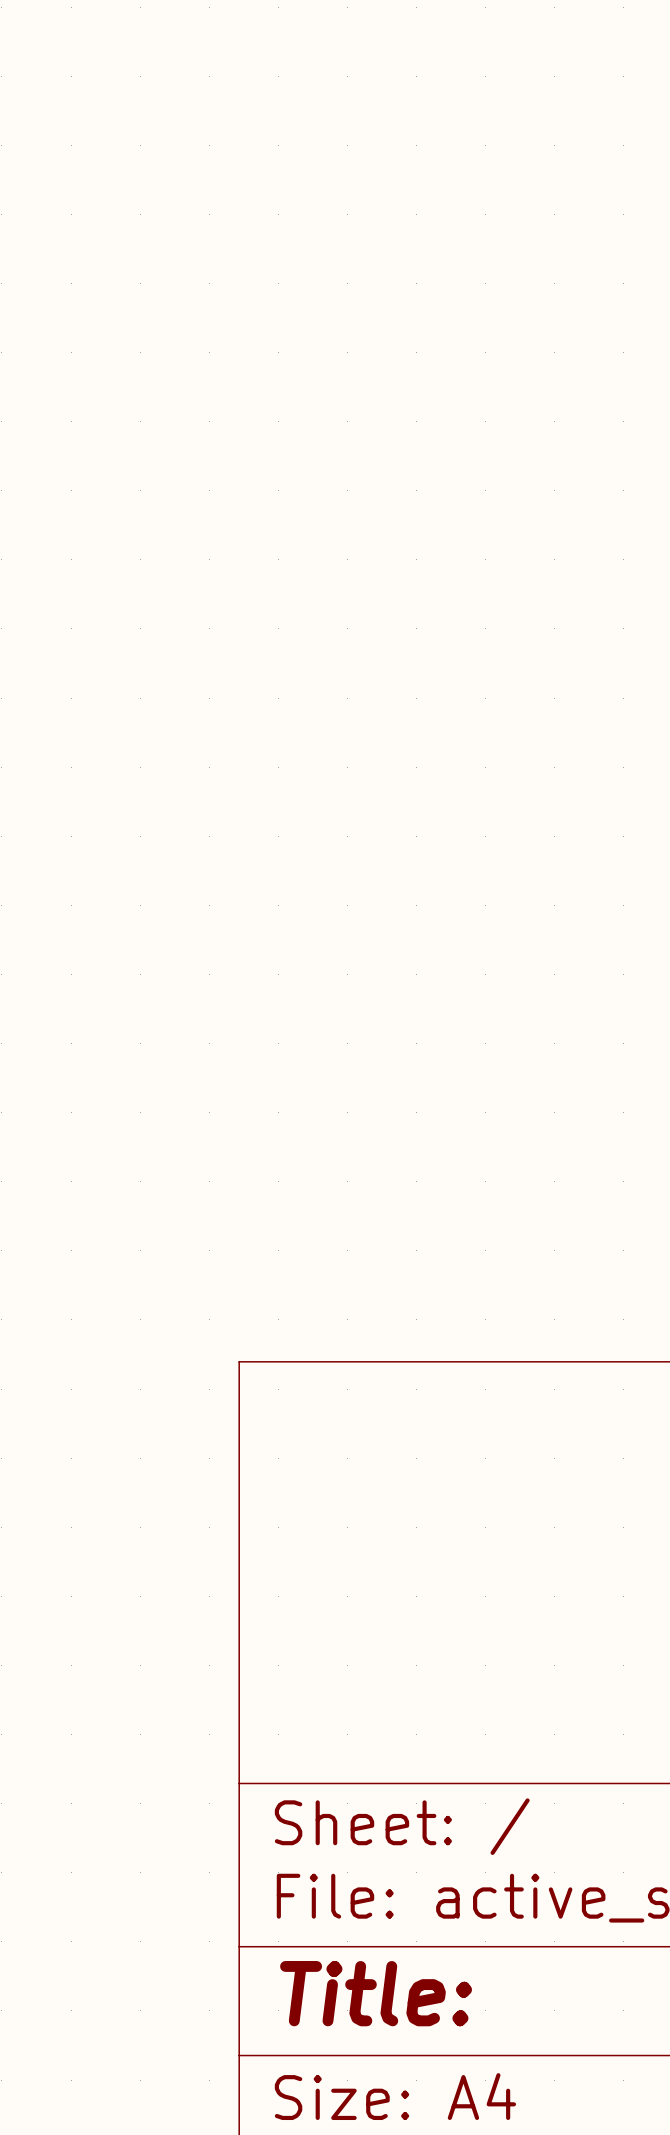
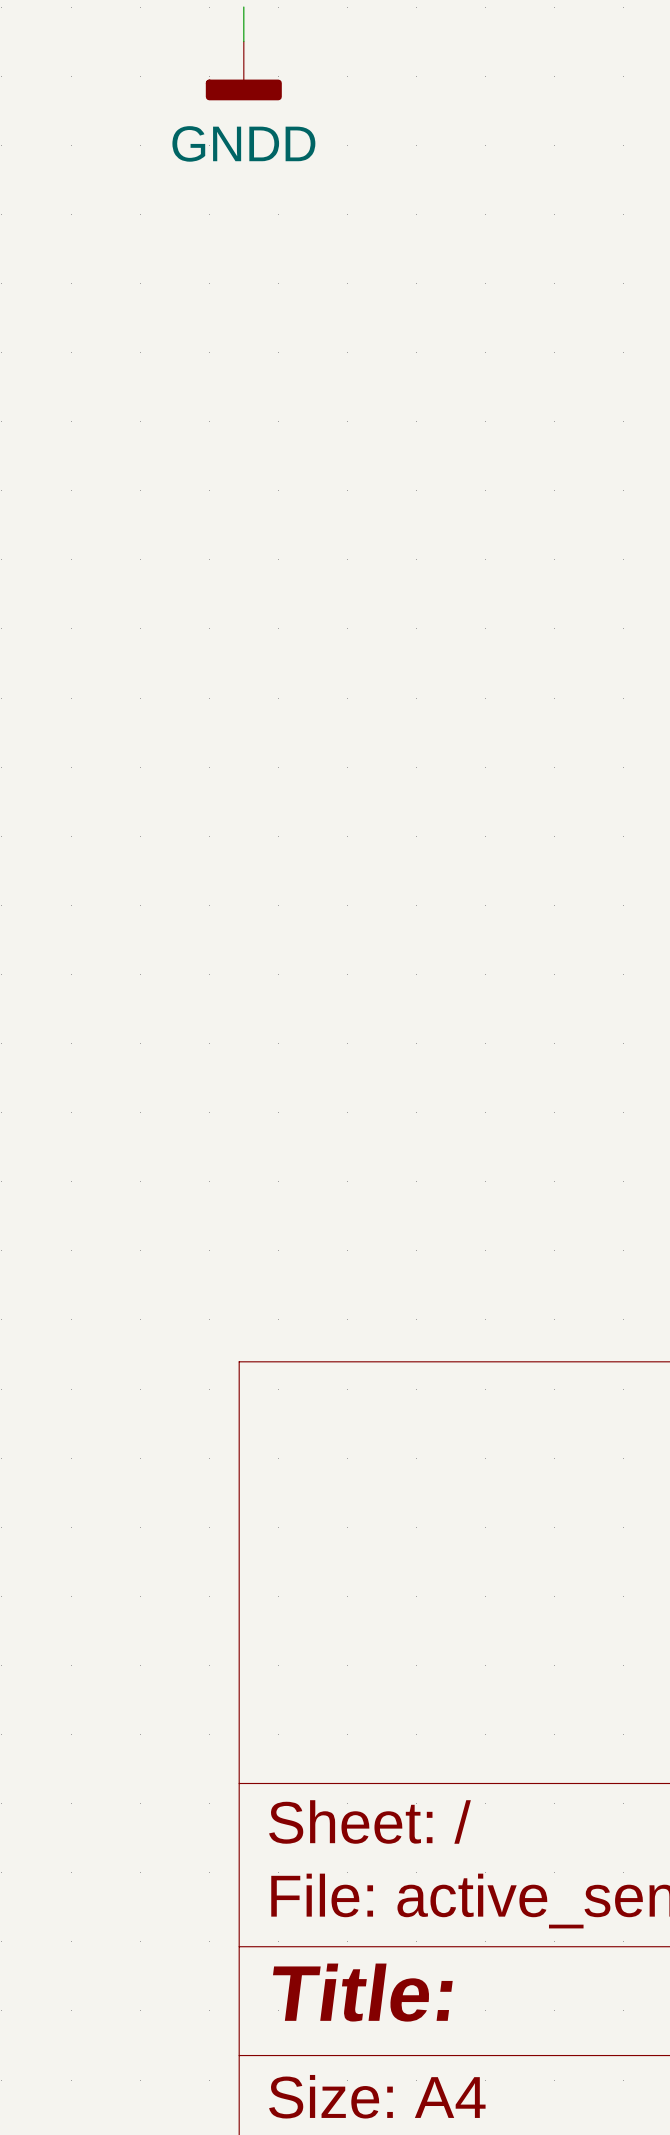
wire: none -> (243, 7) (243, 41)
power symbol: none -> GNDD (243, 70)

